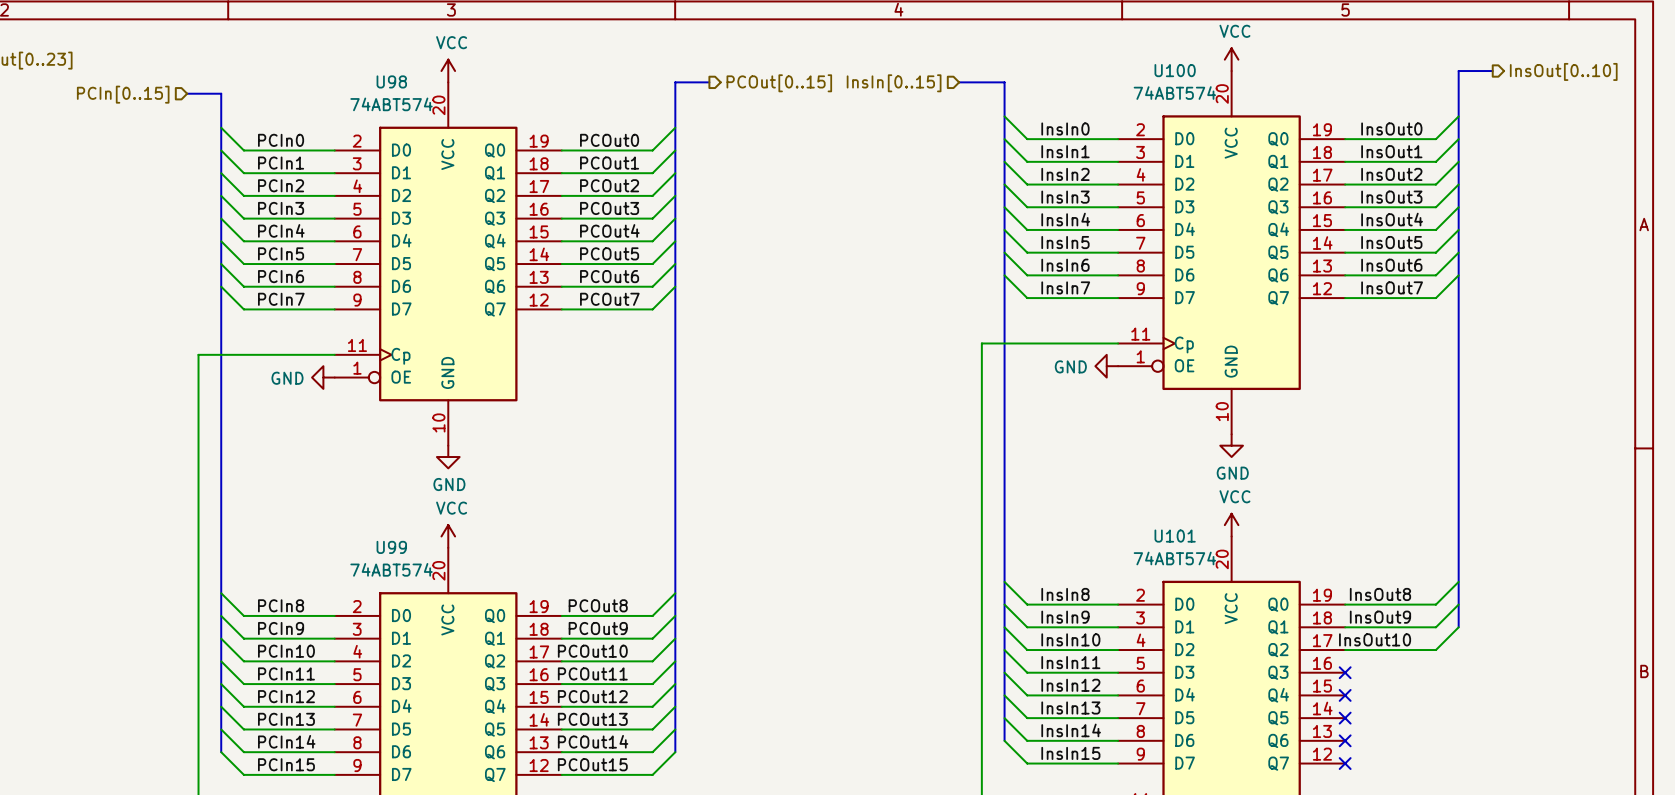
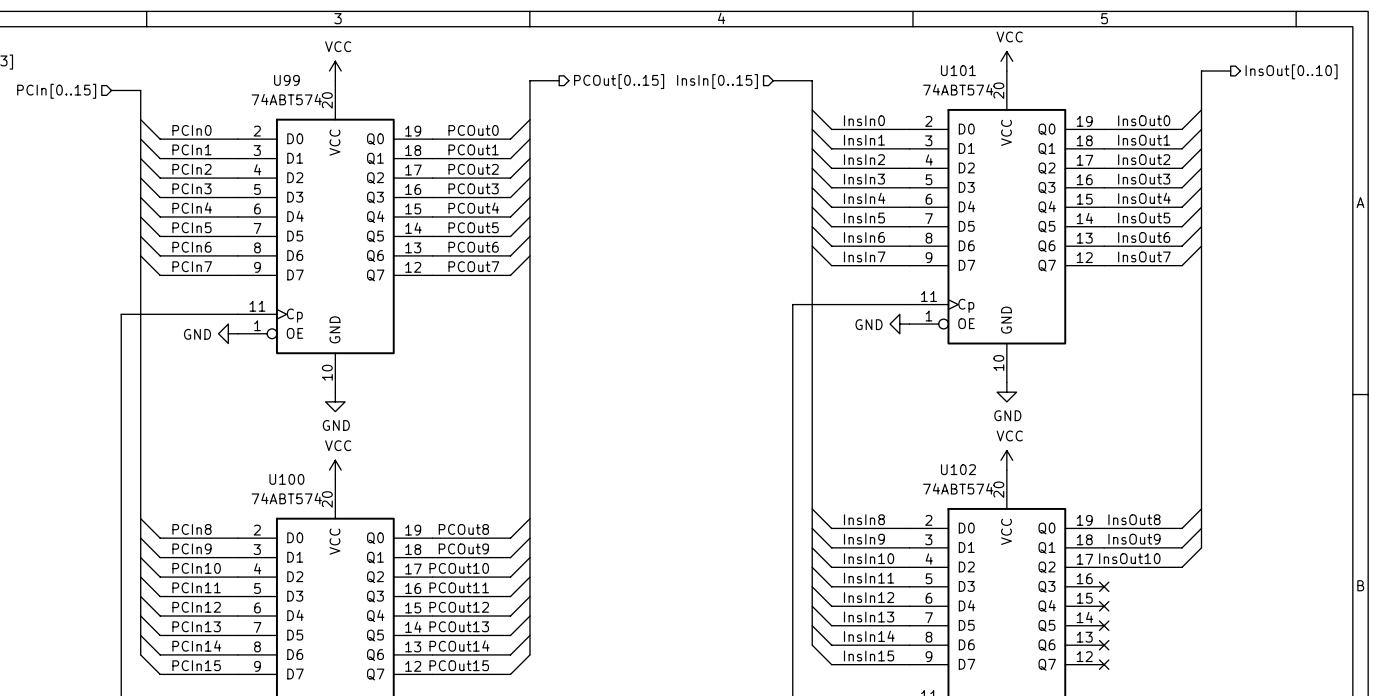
U100 name: U100 (1175, 70) -> U101 (958, 70)
U98 name: U98 (391, 81) -> U99 (286, 80)
U101 name: U101 (1175, 536) -> U102 (958, 469)
U99 name: U99 (391, 547) -> U100 (286, 479)

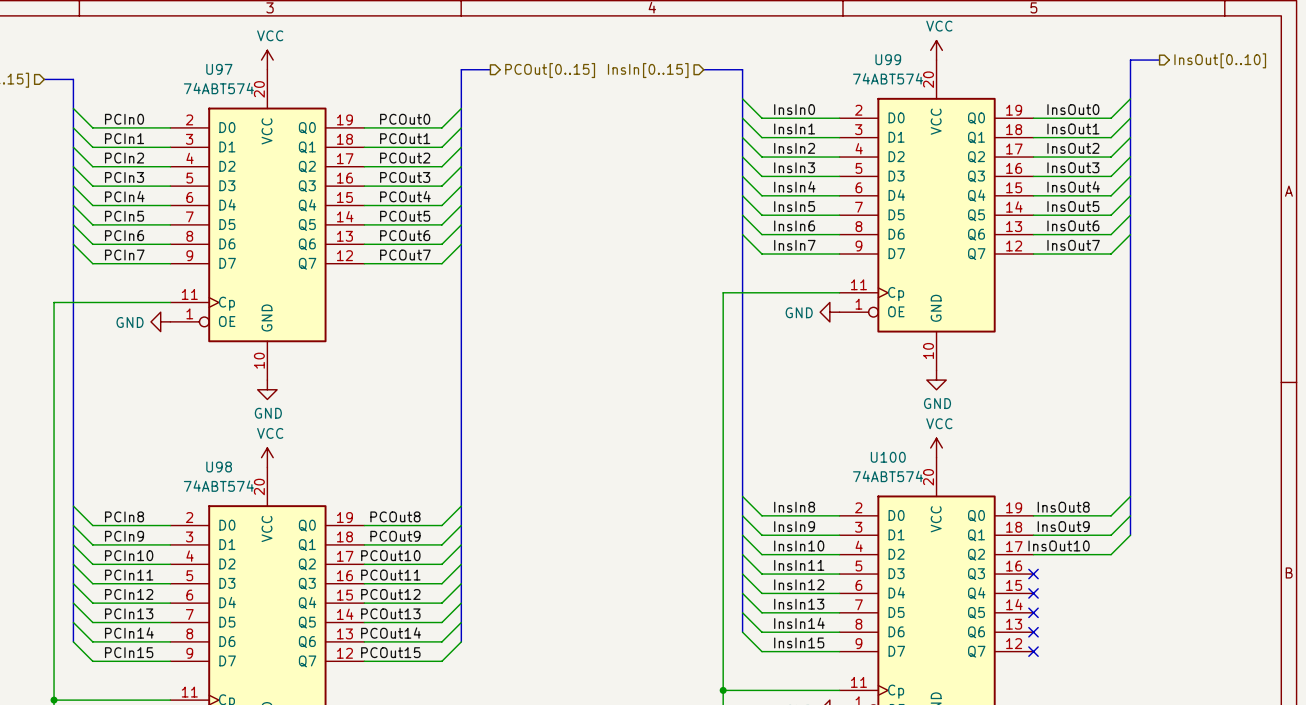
U101 name: U101 (958, 70) -> U99 (888, 59)
U99 name: U99 (286, 80) -> U97 (219, 69)
U102 name: U102 (958, 469) -> U100 (888, 457)
U100 name: U100 (286, 479) -> U98 (219, 466)

